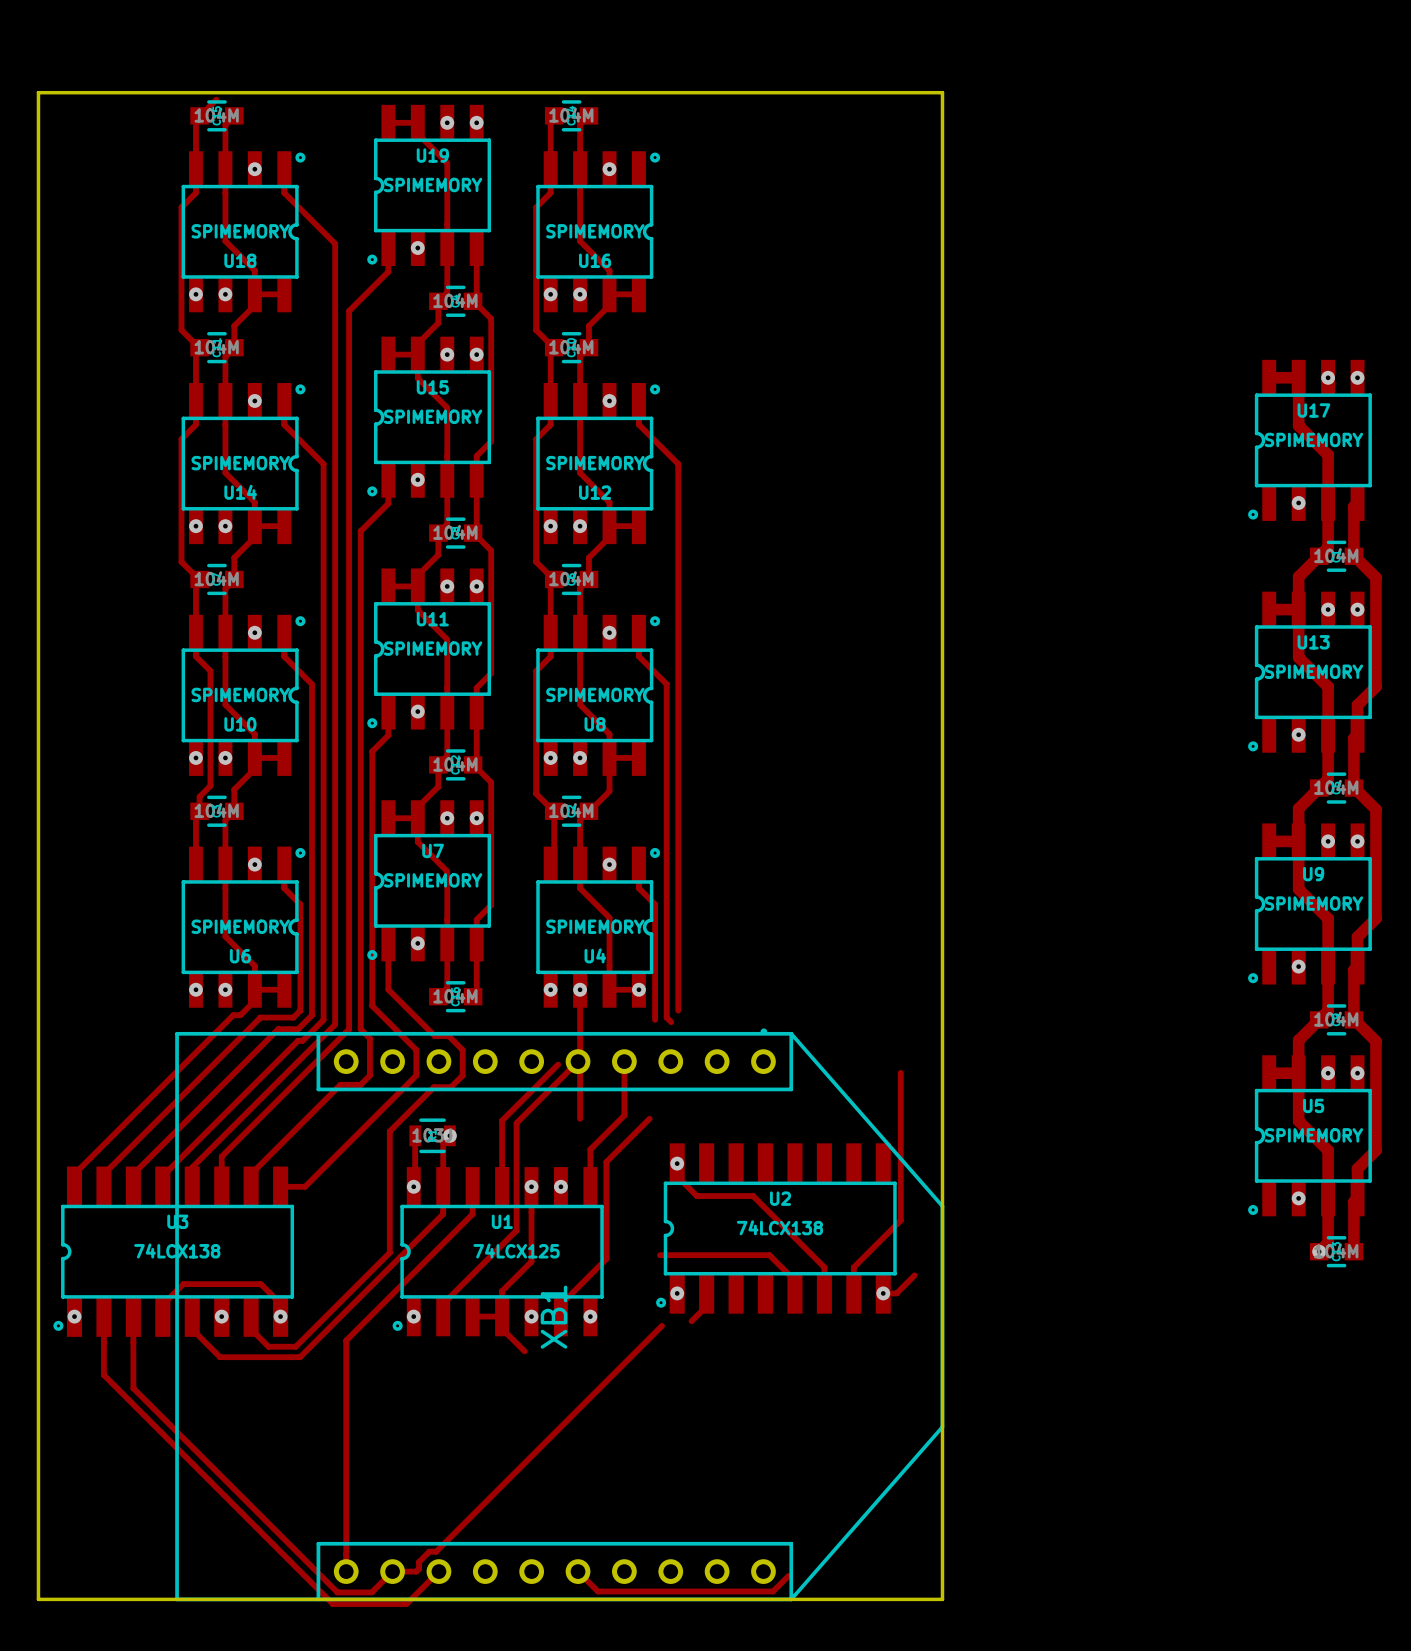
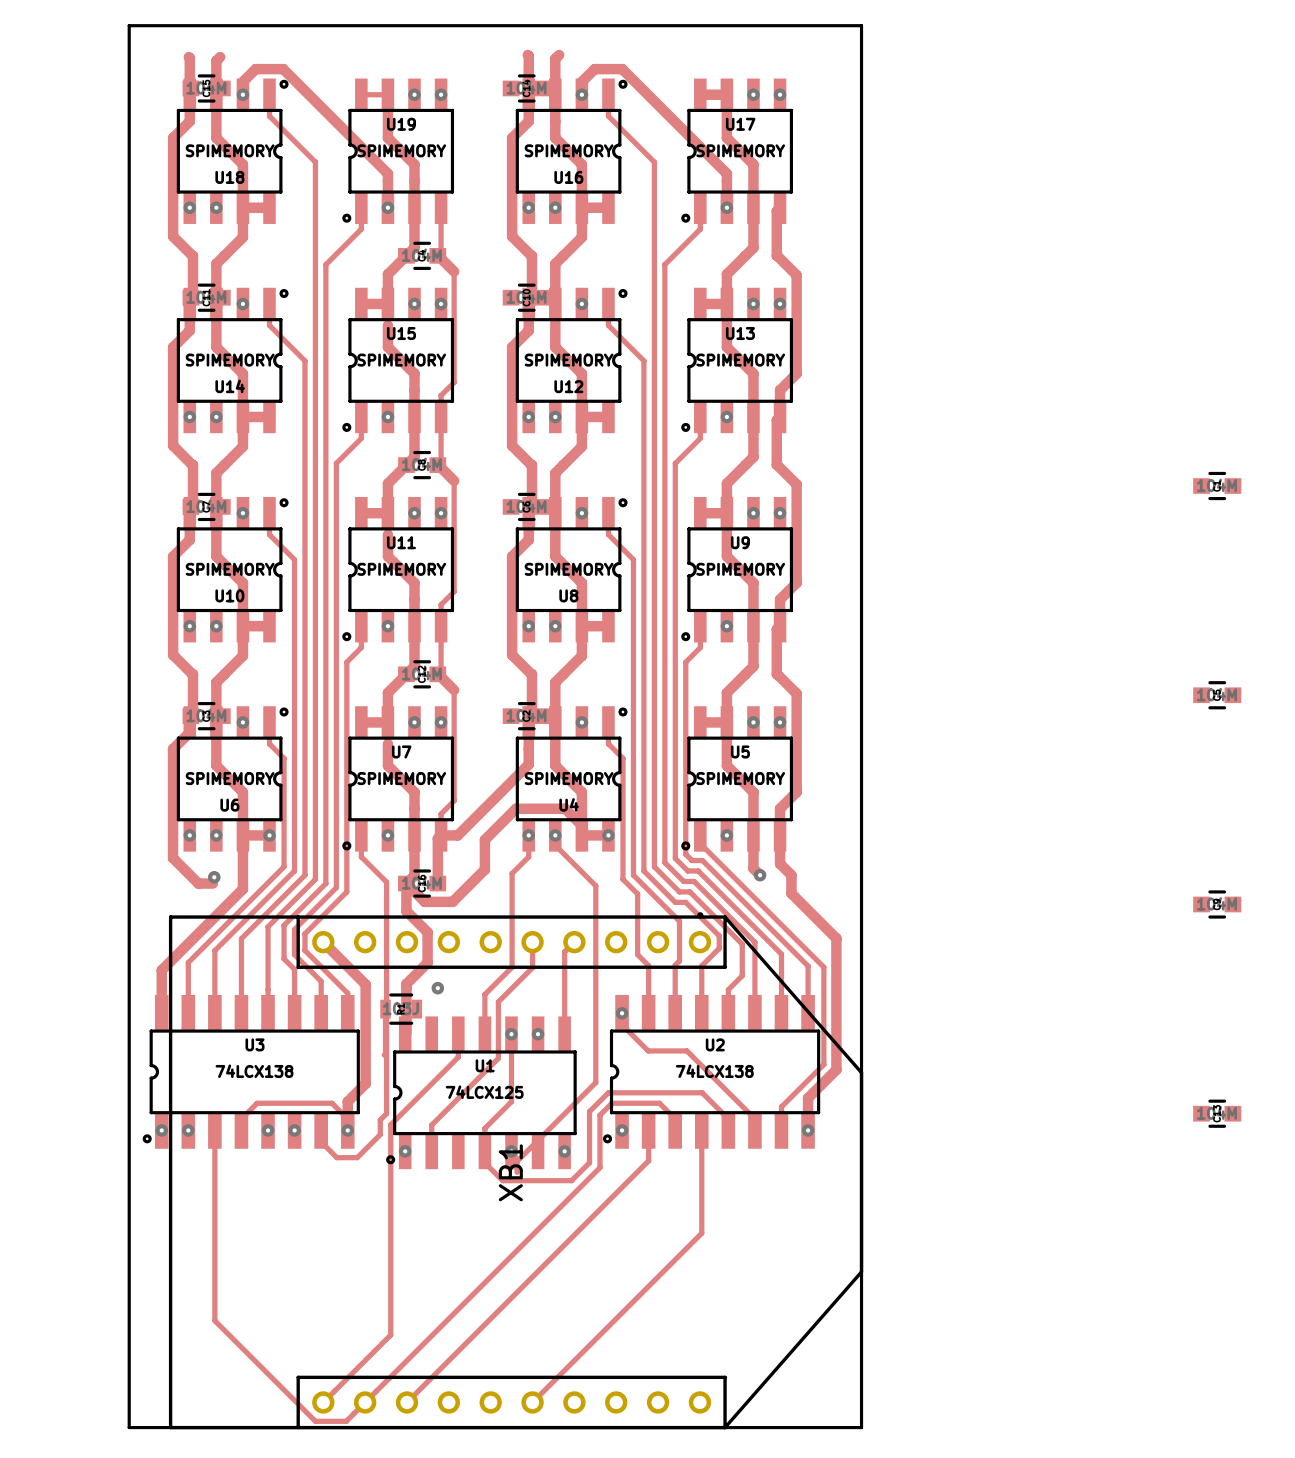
track: none -> (559, 54) (555, 58) (555, 137) (581, 164) (581, 237) (555, 263) (555, 347) (581, 373) (581, 446) (555, 473) (555, 556) (581, 582) (581, 655) (555, 682) (555, 765) (581, 792) (581, 835) (608, 835)
track: none -> (188, 57) (189, 121) (173, 138) (173, 236) (193, 255) (193, 300) (189, 303) (189, 330) (173, 347) (173, 445) (193, 465) (193, 509) (189, 513) (189, 539) (173, 556) (173, 654) (193, 674) (193, 719) (189, 722) (189, 732) (173, 749) (173, 858) (198, 883) (212, 883)
track: none -> (220, 57) (216, 60) (216, 137) (242, 164) (242, 237) (216, 263) (216, 347) (242, 373) (242, 446) (216, 473) (216, 556) (242, 582) (242, 655) (216, 682) (216, 765) (242, 792) (242, 889) (161, 970) (161, 1013)
board edge: (942, 92) (38, 92) (38, 1599) (131, 1599) -> (861, 67) (861, 25) (129, 25) (129, 1427)
track: (216, 99) (195, 119) (195, 192) (181, 207) (181, 330) (199, 347) (195, 351) (195, 424) (181, 439) (181, 561) (199, 579) (195, 583) (195, 656) (210, 671) (210, 785) (199, 796) (199, 811) (195, 814) (195, 864) -> none
track: (233, 115) (225, 124) (225, 241) (254, 270) (254, 305) (234, 325) (234, 347) (225, 356) (225, 472) (254, 502) (254, 537) (234, 557) (234, 579) (225, 588) (225, 704) (254, 734) (254, 768) (234, 789) (234, 811) (225, 820) (225, 936) (254, 966) (254, 1000) (240, 1015) (233, 1015) (74, 1174) (74, 1186) -> none
track: (554, 115) (550, 119) (550, 192) (536, 207) (536, 330) (554, 347) (550, 351) (550, 424) (536, 439) (536, 561) (554, 579) (550, 583) (550, 656) (536, 671) (536, 793) (554, 811) -> none
track: (588, 115) (580, 124) (580, 241) (609, 270) (609, 305) (588, 325) (588, 347) (580, 356) (580, 472) (609, 502) (609, 537) (588, 557) (588, 579) (580, 588) (580, 704) (609, 734) (609, 791) (580, 820) (580, 888) (609, 917) (609, 989) (638, 989) -> none
track: none -> (242, 94) (242, 81) (255, 69) (283, 69) (387, 173) (387, 207)
via: none -> (242, 94)
track: none -> (269, 94) (269, 116) (315, 162) (315, 879) (268, 926) (268, 1013)
track: none -> (581, 94) (581, 81) (594, 69) (622, 69) (726, 173) (726, 207)
via: none -> (581, 94)
track: none -> (608, 94) (608, 116) (654, 162) (654, 866) (679, 891) (689, 891) (742, 944) (742, 975) (728, 989) (728, 1013)
track: none -> (700, 94) (726, 94) (726, 137) (753, 164) (753, 247) (726, 274) (726, 347) (753, 373) (753, 457) (726, 483) (726, 556) (753, 582) (753, 666) (726, 692) (726, 765) (753, 792) (753, 868) (760, 875)
via: none -> (753, 94)
via: none -> (780, 94)
track: (417, 133) (447, 163) (447, 200) -> (387, 104) (387, 137) (414, 164)
via: (254, 169) -> none
track: (284, 169) (284, 192) (335, 243) (335, 1024) (192, 1167) (192, 1186) -> none
via: (609, 169) -> none
track width: thin (447, 200) (447, 292) (438, 301) -> thick (414, 164) (414, 247) (406, 255)
U18 position: (243, 231) -> (232, 151)
U16 position: (598, 231) -> (571, 151)
via: none -> (189, 207)
via: none -> (216, 207)
via: none -> (528, 207)
via: none -> (555, 207)
track: none -> (700, 207) (700, 229) (664, 264) (664, 862) (683, 881) (694, 881) (754, 942) (754, 1013)
via: none -> (726, 207)
track: none -> (780, 207) (776, 210) (776, 255) (796, 275) (796, 373) (780, 390) (780, 416) (776, 420) (776, 465) (796, 484) (796, 582) (780, 599) (780, 626) (776, 629) (776, 674) (796, 693) (796, 792) (780, 808) (780, 863) (791, 875) (791, 893) (836, 938) (836, 1069) (808, 1098) (808, 1130)
via: (195, 294) -> none
via: (225, 294) -> none
track: (254, 294) (284, 294) -> (242, 207) (269, 207)
via: (550, 294) -> none
via: (580, 294) -> none
track: (609, 294) (638, 294) -> (581, 207) (608, 207)
track: (438, 301) (438, 323) (417, 343) -> (406, 255) (387, 274) (387, 294)
track width: thin (473, 301) (491, 318) -> thick (437, 255) (454, 271)
via: none -> (242, 303)
track: none -> (269, 303) (269, 325) (304, 360) (304, 875) (241, 938) (241, 1013)
track width: thin (388, 354) (417, 354) -> thick (361, 303) (387, 303)
via: none -> (581, 303)
track: none -> (608, 303) (608, 325) (643, 360) (643, 871) (675, 902) (685, 902) (719, 935) (719, 948) (701, 965) (701, 1013)
via: none -> (753, 303)
via: none -> (780, 303)
track: (1269, 377) (1298, 377) (1298, 425) (1328, 455) (1328, 547) (1298, 576) (1298, 657) (1328, 686) (1328, 779) (1298, 808) (1298, 889) (1328, 918) (1328, 1010) (1298, 1040) (1298, 1121) (1328, 1150) (1328, 1242) (1319, 1251) -> none
via: (1328, 377) -> none
via: (1357, 377) -> none
track: (417, 378) (447, 407) (447, 431) -> (387, 325) (387, 347) (414, 373)
via: (254, 400) -> none
track: (284, 400) (284, 424) (323, 464) (323, 1019) (302, 1040) (298, 1040) (162, 1176) (162, 1186) -> none
via: (609, 400) -> none
track: (638, 400) (638, 424) (678, 464) (678, 858) -> (608, 722) (608, 743) (623, 758)
track width: thin (447, 431) (447, 524) (438, 533) -> thick (414, 373) (414, 457) (406, 465)
U17 position: (1309, 440) -> (737, 151)
U14 position: (243, 463) -> (232, 360)
U12 position: (598, 463) -> (571, 360)
via: none -> (189, 416)
via: none -> (216, 416)
via: none -> (528, 416)
via: none -> (555, 416)
track: none -> (700, 416) (700, 438) (675, 463) (675, 858) (687, 871) (698, 871) (781, 954) (781, 1013)
via: none -> (726, 416)
via: (1298, 502) -> none
track: (1357, 502) (1353, 506) (1353, 556) (1375, 577) (1375, 686) (1357, 705) (1357, 734) (1353, 738) (1353, 788) (1375, 809) (1375, 918) (1357, 937) (1357, 966) (1353, 970) (1353, 1019) (1375, 1041) (1375, 1150) (1357, 1168) (1357, 1198) (1353, 1201) (1353, 1251) -> none
via: (195, 526) -> none
via: (225, 526) -> none
track: (254, 526) (284, 526) -> (242, 416) (269, 416)
via: (550, 526) -> none
via: (580, 526) -> none
track: (609, 526) (638, 526) -> (581, 416) (608, 416)
track: (438, 533) (438, 554) (417, 575) -> (406, 465) (387, 483) (387, 503)
track width: thin (473, 533) (491, 550) -> thick (437, 465) (454, 480)
via: none -> (242, 513)
track: none -> (269, 513) (269, 534) (294, 559) (294, 871) (214, 950) (214, 1013)
track width: thin (388, 586) (417, 586) -> thick (361, 513) (387, 513)
via: none -> (581, 513)
track: none -> (608, 513) (608, 534) (633, 559) (633, 875) (679, 921) (679, 960) (675, 965) (675, 1013)
via: none -> (753, 513)
via: none -> (780, 513)
track: (1269, 609) (1298, 609) -> (700, 303) (726, 303)
via: (1328, 609) -> none
via: (1357, 609) -> none
track: (417, 610) (447, 639) (447, 663) -> (387, 534) (387, 556) (414, 582)
via: (254, 632) -> none
track: (284, 632) (284, 656) (311, 684) (311, 1015) (298, 1029) (278, 1029) (133, 1174) (133, 1186) -> none
via: (609, 632) -> none
track: (638, 632) (638, 656) (666, 684) (666, 1017) (671, 1022) -> none
track width: thin (447, 663) (447, 755) (438, 764) -> thick (414, 582) (414, 666) (406, 674)
U13 position: (1309, 672) -> (737, 360)
U10 position: (243, 695) -> (232, 569)
U8 position: (598, 695) -> (571, 569)
via: none -> (189, 626)
via: none -> (216, 626)
via: none -> (528, 626)
via: none -> (555, 626)
track: none -> (700, 626) (700, 647) (685, 662) (685, 854) (692, 860) (702, 860) (808, 966) (808, 1013)
via: none -> (726, 626)
via: (1298, 734) -> none
via: (195, 757) -> none
via: (225, 757) -> none
track: (254, 757) (284, 757) -> (242, 626) (269, 626)
via: (550, 757) -> none
via: (580, 757) -> none
track: (609, 757) (638, 757) -> (581, 626) (608, 626)
track: (438, 764) (438, 786) (417, 807) -> (406, 674) (387, 692) (387, 712)
track width: thin (473, 764) (491, 782) -> thick (437, 674) (454, 690)
track: (554, 811) (554, 860) (550, 864) -> none
via: none -> (242, 722)
track: none -> (269, 722) (269, 743) (284, 758) (284, 866) (188, 962) (188, 1013)
track width: thin (388, 818) (417, 818) -> thick (361, 722) (387, 722)
via: none -> (581, 722)
via: none -> (753, 722)
via: none -> (780, 722)
track: (417, 841) (447, 871) (447, 895) -> (387, 743) (387, 765) (414, 792)
track: (1269, 841) (1298, 841) -> (700, 513) (726, 513)
via: (1328, 841) -> none
via: (1357, 841) -> none
via: (254, 864) -> none
track: (284, 864) (284, 888) (300, 904) (300, 1010) (293, 1017) (260, 1017) (103, 1174) (103, 1186) -> none
via: (609, 864) -> none
track: (638, 864) (638, 888) (655, 904) (655, 1019) -> none
track width: thin (447, 895) (447, 987) (438, 996) -> thick (414, 792) (414, 875) (406, 883)
U9 position: (1309, 903) -> (737, 569)
U6 position: (243, 927) -> (232, 778)
U4 position: (598, 927) -> (571, 778)
track: none -> (581, 825) (565, 808) (515, 808) (484, 839) (484, 869) (452, 901) (424, 901) (406, 883) (406, 911) (427, 932) (427, 962) (406, 983) (406, 1032)
via: none -> (189, 835)
via: none -> (216, 835)
via: none -> (269, 835)
track: (476, 943) (476, 993) (473, 996) -> (527, 54) (528, 121) (512, 138) (512, 236) (531, 255) (531, 300) (528, 303) (528, 330) (512, 347) (512, 445) (531, 465) (531, 509) (528, 513) (528, 539) (512, 556) (512, 654) (531, 674) (531, 719) (528, 722) (528, 764) (457, 835) (441, 835) (437, 838) (437, 883)
track: none -> (528, 835) (528, 856) (512, 873) (512, 967) (484, 994) (484, 1034)
via: none -> (528, 835)
via: none -> (555, 835)
via: none -> (608, 835)
via: none -> (726, 835)
via: (1298, 966) -> none
track: (388, 967) (388, 989) (434, 1036) (448, 1036) (462, 1050) (462, 1075) (451, 1087) (434, 1087) (389, 1131) (389, 1252) (295, 1346) (268, 1346) (251, 1329) (251, 1316) -> none
via: none -> (760, 875)
via: (195, 989) -> none
track: (254, 989) (284, 989) -> (242, 835) (269, 835)
via: (550, 989) -> none
track: (580, 989) (580, 1118) -> none
via: (580, 989) -> none
via: (638, 989) -> none
track: (678, 992) (678, 1010) -> (623, 879) (637, 894) (637, 954) (648, 965) (648, 1013)
track: (349, 996) (349, 1029) -> (346, 891) (325, 912)
track: none -> (325, 883) (284, 925) (284, 958) (294, 969) (294, 1013)
track: (360, 1001) (360, 1029) (369, 1038) (369, 1075) (360, 1084) (340, 1084) (251, 1174) (251, 1186) -> (336, 887) (294, 929) (294, 954) (321, 981) (321, 1013)
track: (372, 1005) (416, 1050) -> (361, 856) (386, 882) (386, 931)
track: (325, 1052) (221, 1156) (221, 1186) -> (304, 933) (304, 950) (347, 993) (347, 1013)
track: none -> (323, 942) (365, 984) (365, 1083) (347, 1101) (347, 1130) (347, 1118) (332, 1103) (257, 1103) (241, 1118) (241, 1130)
track: (578, 1061) (516, 1123) (516, 1230) (443, 1303) (443, 1316) -> (532, 942) (532, 967) (498, 1001) (498, 1058) (431, 1125) (431, 1151)
track: (624, 1061) (624, 1115) (590, 1149) (590, 1186) -> (574, 942) (564, 951) (564, 1034)
track: (558, 1064) (502, 1120) (502, 1186) -> none
track: (900, 1072) (900, 1089) -> (700, 835) (700, 843) (823, 967)
track: (1269, 1073) (1298, 1073) -> (700, 722) (726, 722)
via: (1328, 1073) -> none
via: (1357, 1073) -> none
track: (416, 1075) (305, 1186) (280, 1186) -> (386, 954) (386, 1113) (380, 1119) (380, 1134) (357, 1157) (336, 1157) (321, 1141) (321, 1130)
track: (649, 1118) (606, 1161) (606, 1258) -> (555, 835) (555, 845) (595, 885) (595, 1082) (558, 1120)
track: (449, 1135) (443, 1142) (443, 1214) (300, 1357) (220, 1357) (192, 1329) (192, 1316) -> none
via position: (449, 1135) -> (437, 988)
U5 position: (1309, 1135) -> (737, 778)
via: none -> (511, 1034)
via: none -> (538, 1034)
track: (677, 1163) (677, 1176) (696, 1196) (753, 1196) (824, 1267) -> (622, 1013) (622, 1024) (648, 1050) (686, 1050) (754, 1118) (754, 1127)
via position: (677, 1163) -> (622, 1013)
via: (413, 1186) -> none
track: (472, 1186) (472, 1214) (346, 1340) (346, 1571) -> (458, 1034) (458, 1057) (390, 1124) (390, 1335) (323, 1402)
track: (531, 1186) (531, 1261) -> (511, 1034) (511, 1101) (490, 1122)
via: (531, 1186) -> none
via: (560, 1186) -> none
track: (900, 1197) (900, 1220) (853, 1267) -> (823, 1064) (781, 1106) (781, 1127)
via: (1298, 1198) -> none
U2 position: (776, 1228) -> (711, 1071)
U1 value position: 74LCX125 (516, 1250) -> 74LCX125 (484, 1092)
U3 position: (173, 1251) -> (251, 1071)
U1 position: (498, 1251) -> (481, 1092)
via: (1319, 1251) -> none
track: (660, 1255) (769, 1255) (794, 1280) (794, 1293) -> none
track: (525, 1267) (502, 1291) (502, 1328) (524, 1351) -> (484, 1128) (484, 1162) (502, 1180) (571, 1180) (589, 1162) (589, 1111) (608, 1092) (702, 1092) (728, 1118) (728, 1130)
via: none -> (161, 1130)
via: none -> (188, 1130)
via: none -> (268, 1130)
via: none -> (294, 1130)
via: none -> (347, 1130)
track: (914, 1275) (896, 1293) (883, 1293) -> none
via: none -> (405, 1151)
via: none -> (511, 1151)
via: none -> (564, 1151)
via position: (677, 1293) -> (622, 1130)
via position: (883, 1293) -> (808, 1130)
track: (706, 1303) (691, 1321) -> (648, 1160) (407, 1402)
via: (74, 1316) -> none
track: (103, 1316) (103, 1375) (332, 1604) (406, 1604) (438, 1571) -> none
track: (133, 1316) (133, 1388) (226, 1481) -> (214, 1130) (214, 1320)
track: (162, 1316) (162, 1304) (183, 1284) (260, 1284) (280, 1303) (280, 1316) -> none
via: (221, 1316) -> none
via: (280, 1316) -> none
via: (413, 1316) -> none
track: (472, 1316) (502, 1316) -> none
via: (531, 1316) -> none
via: (590, 1316) -> none
track: (662, 1325) (436, 1551) (429, 1551) (419, 1562) (419, 1568) (416, 1571) (392, 1571) -> (675, 1130) (675, 1118) (659, 1103) (611, 1103) (599, 1115) (599, 1167) (365, 1402)
track: (578, 1571) (597, 1591) (773, 1591) (788, 1575) -> (532, 1402) (701, 1233) (701, 1130)

